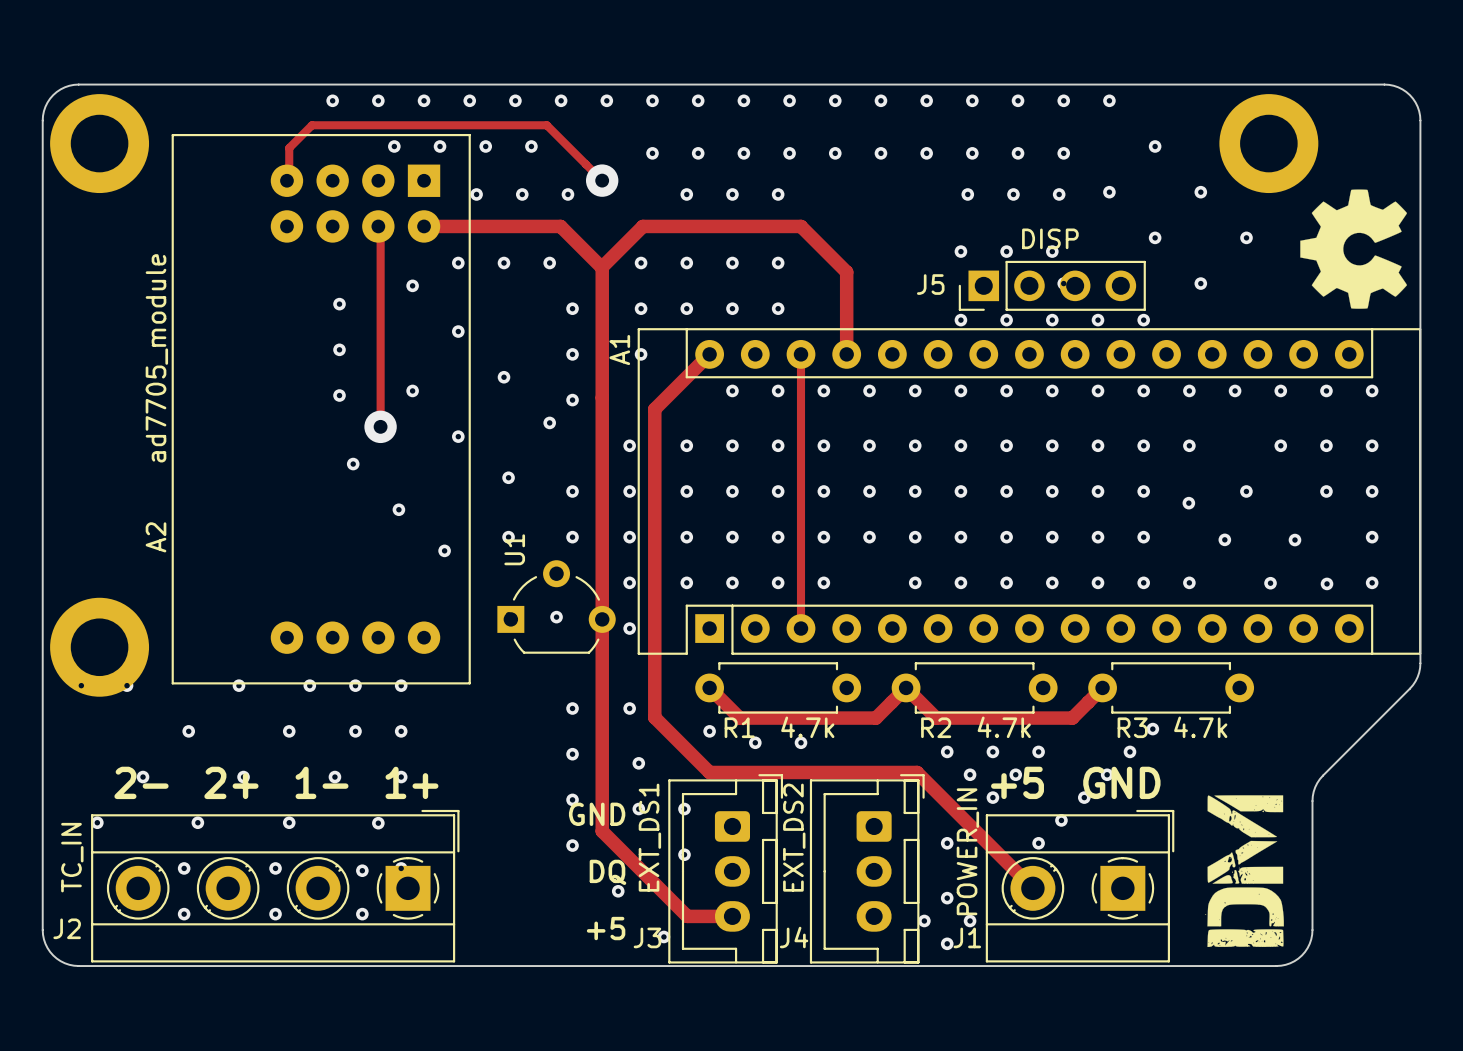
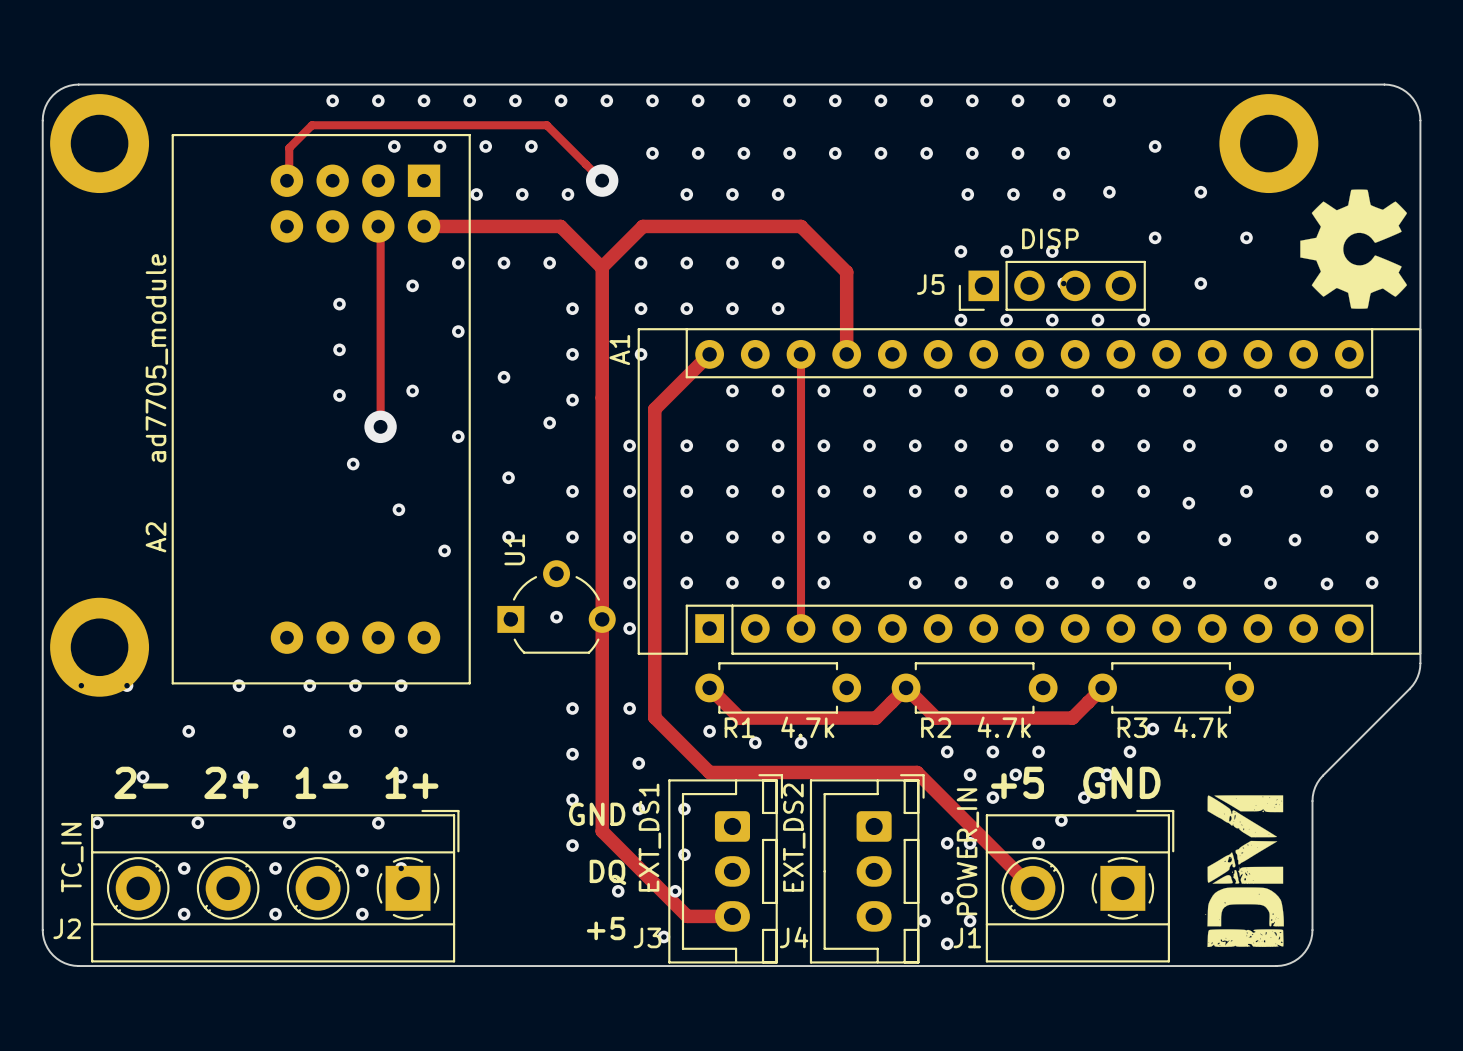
via: none -> (970, 843)
via: none -> (675, 891)

